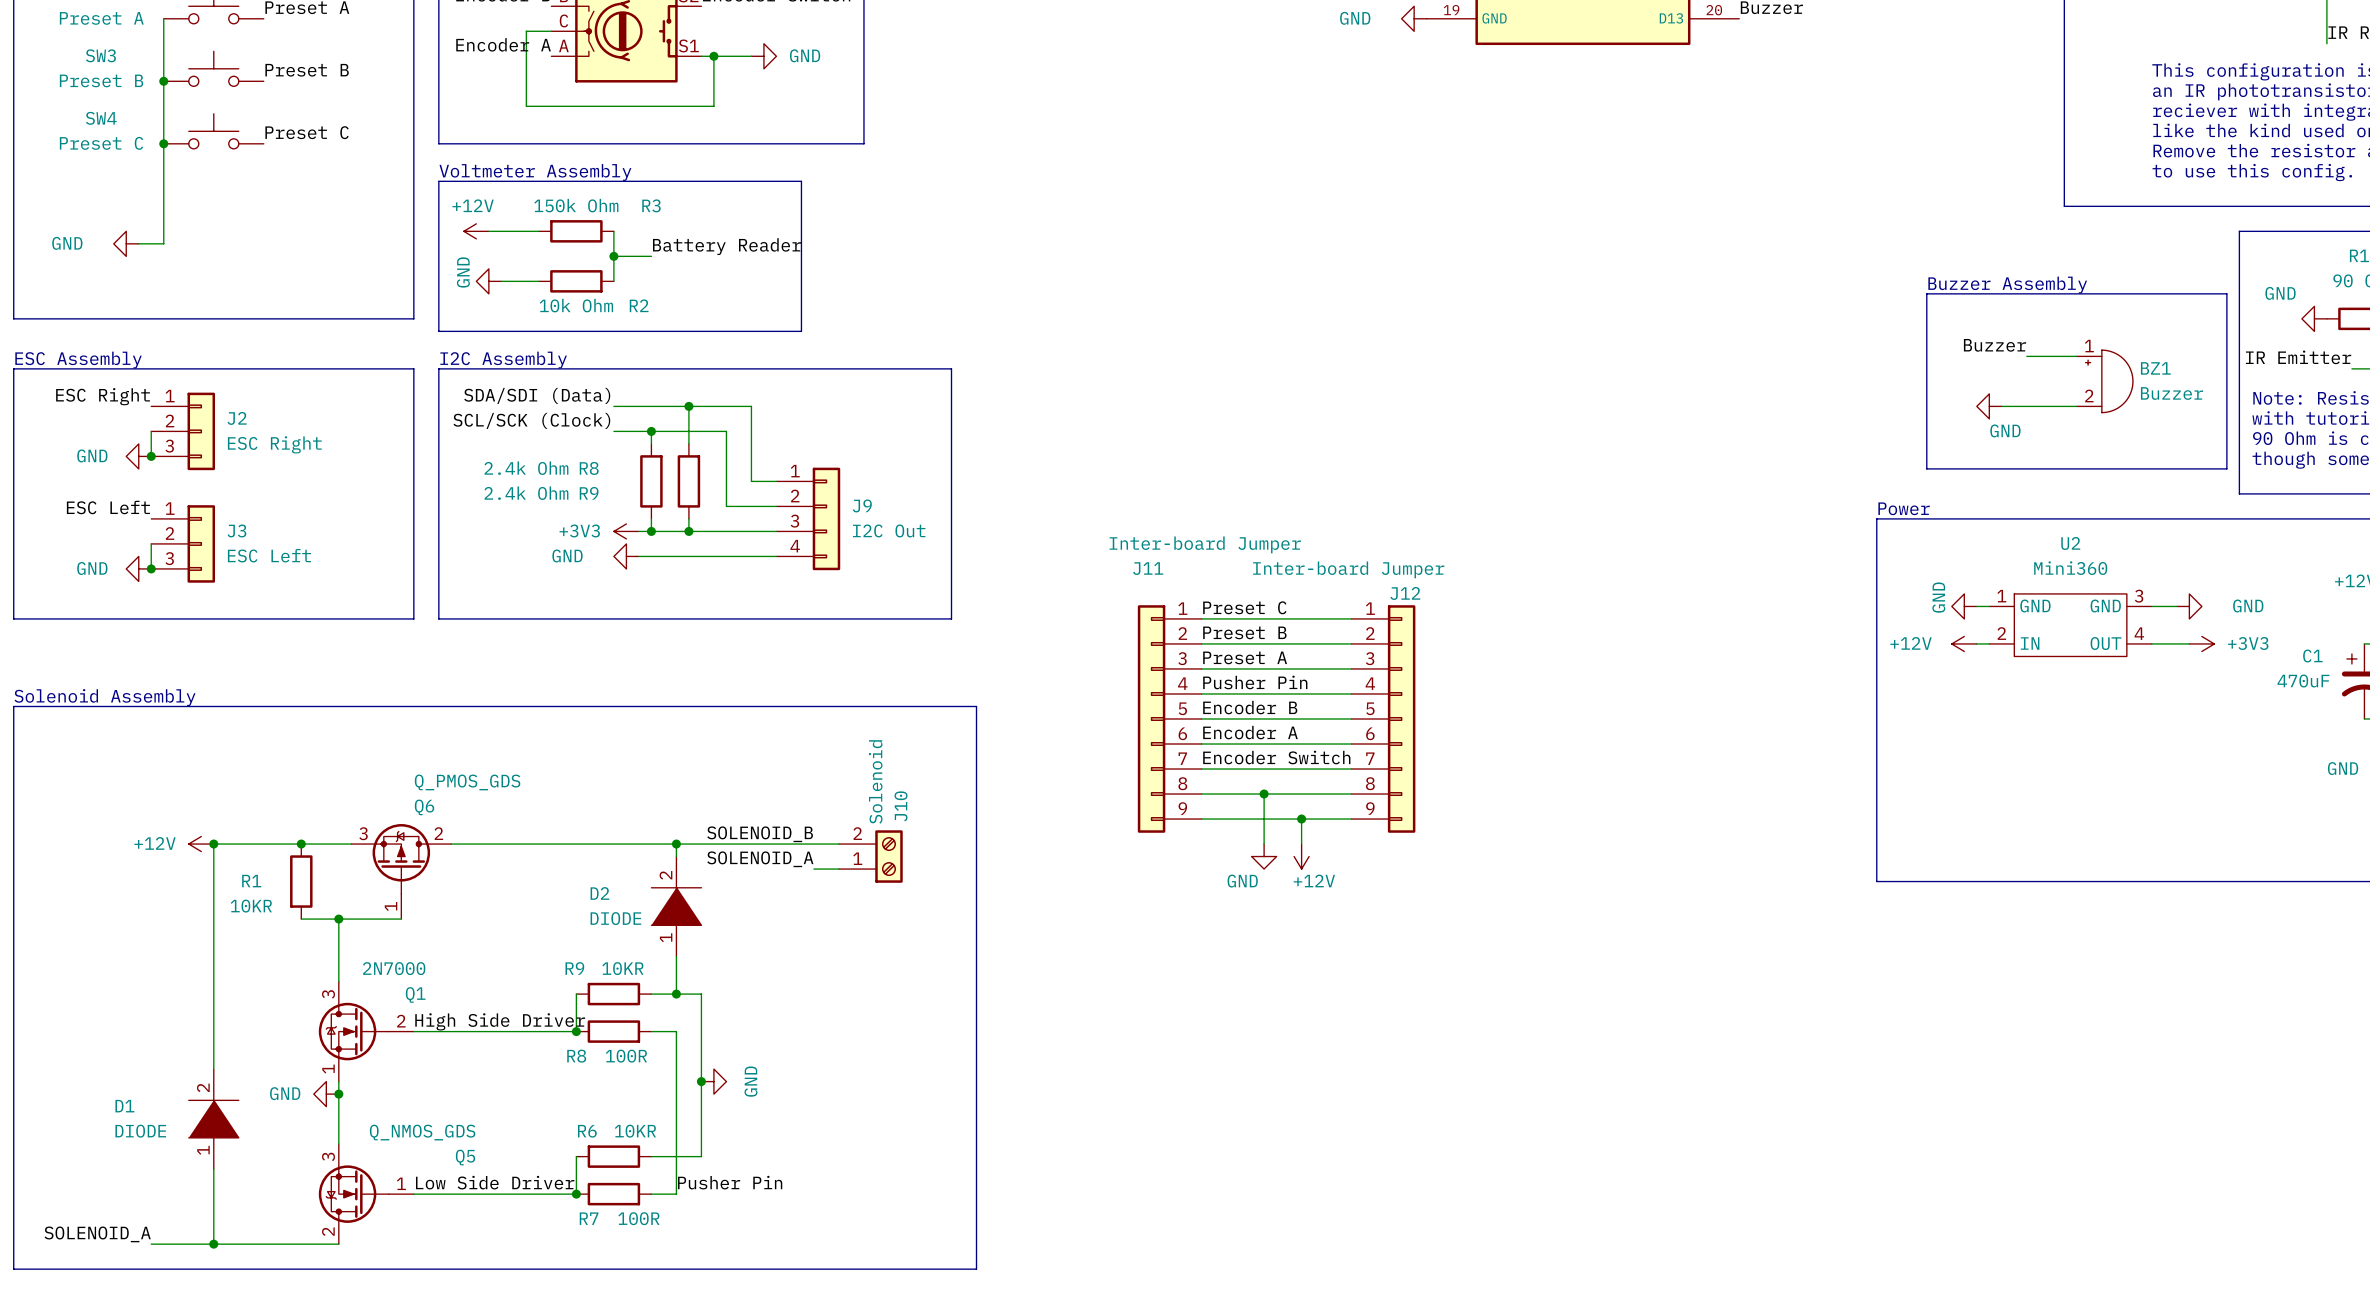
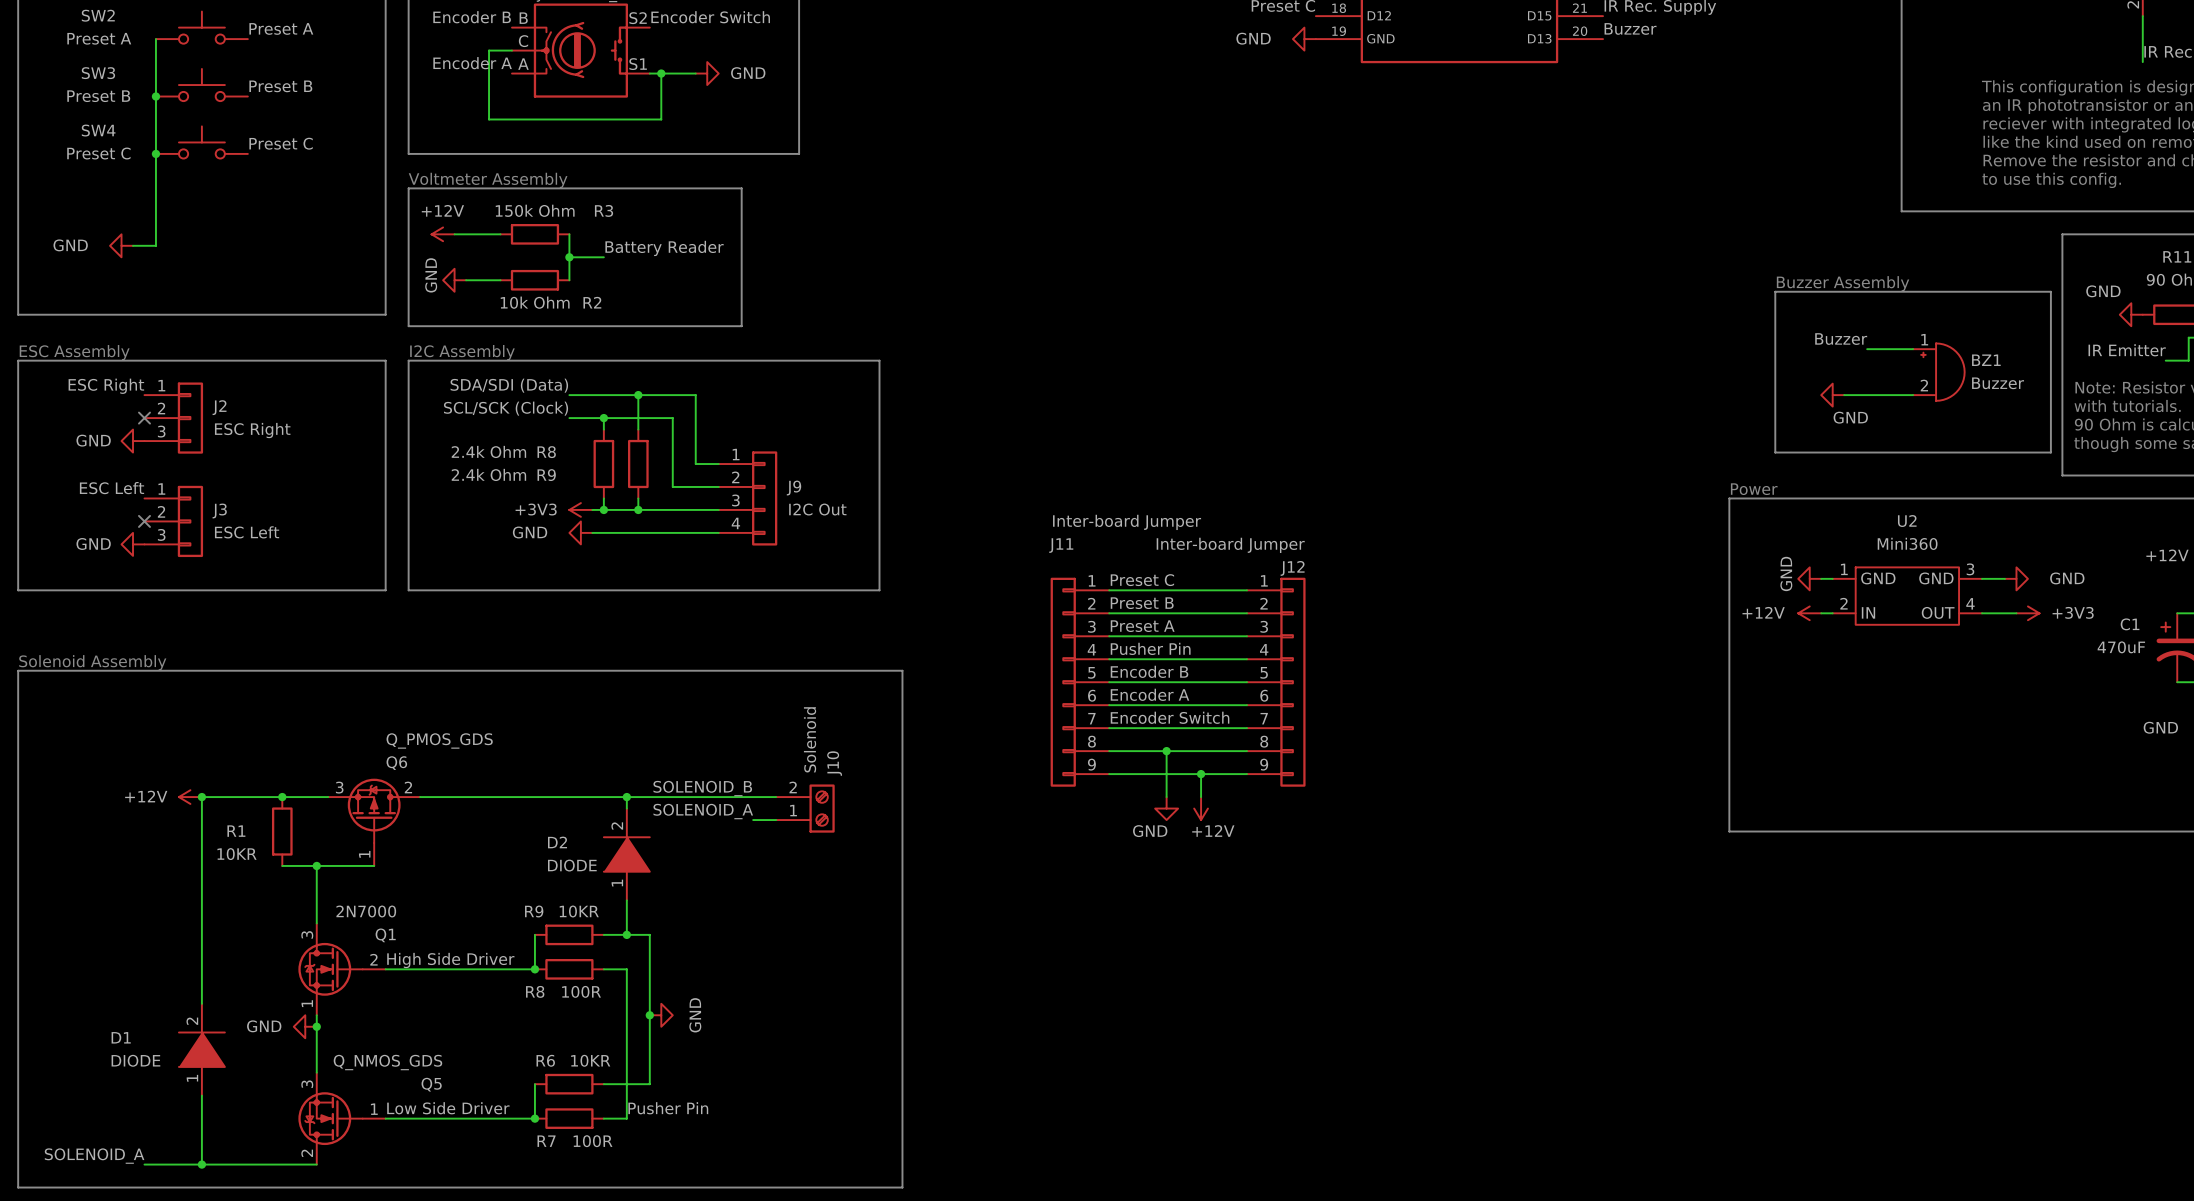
wire: (151, 431) (151, 456) -> none
no-connect mark: none -> (144, 418)
junction: (151, 456) -> none
wire: (151, 543) (151, 568) -> none
no-connect mark: none -> (144, 521)
junction: (151, 568) -> none

